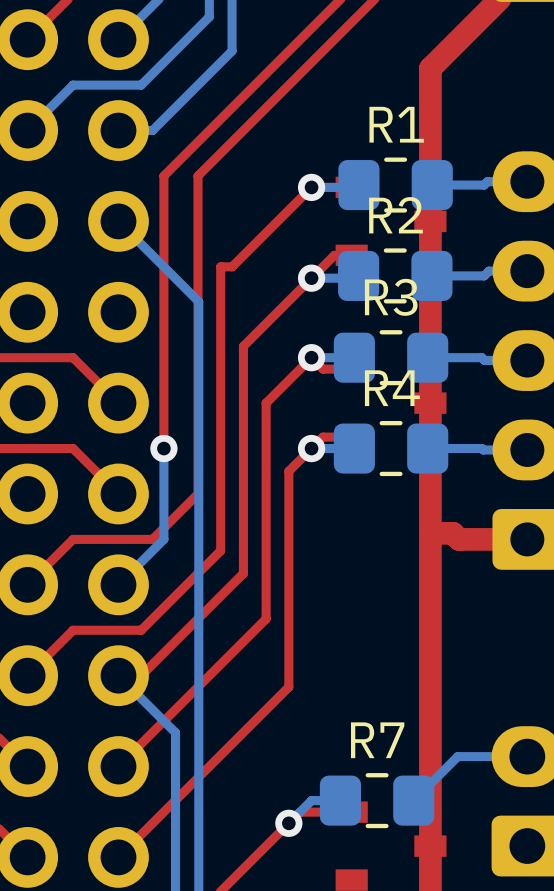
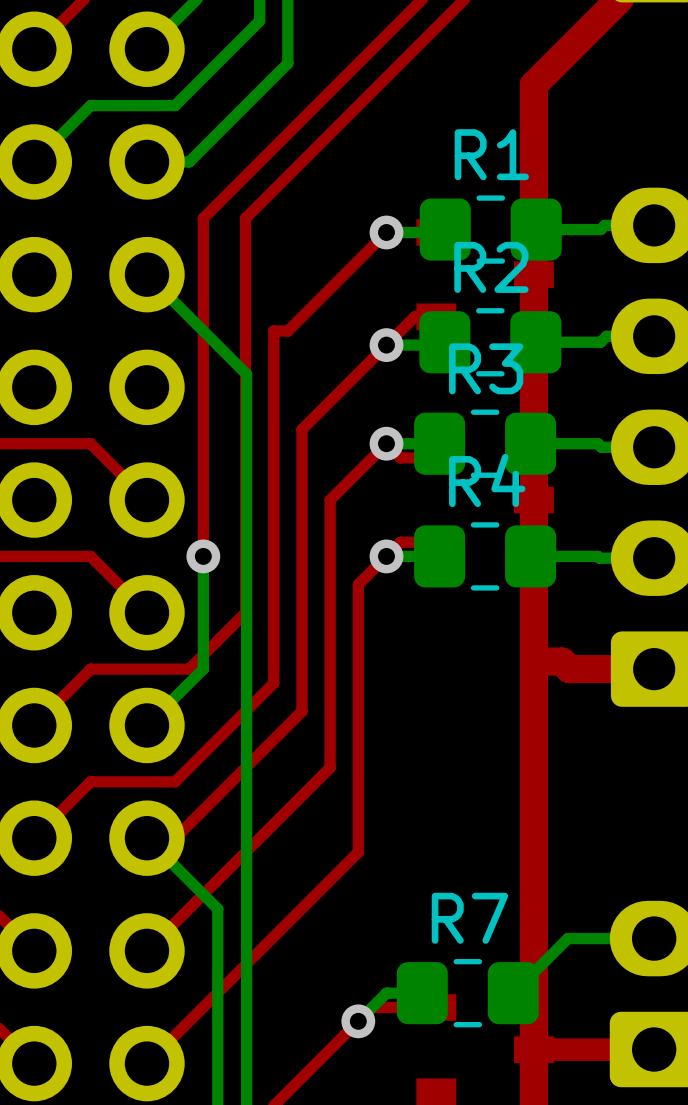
top track: none -> (654, 1049) (533, 1049)

